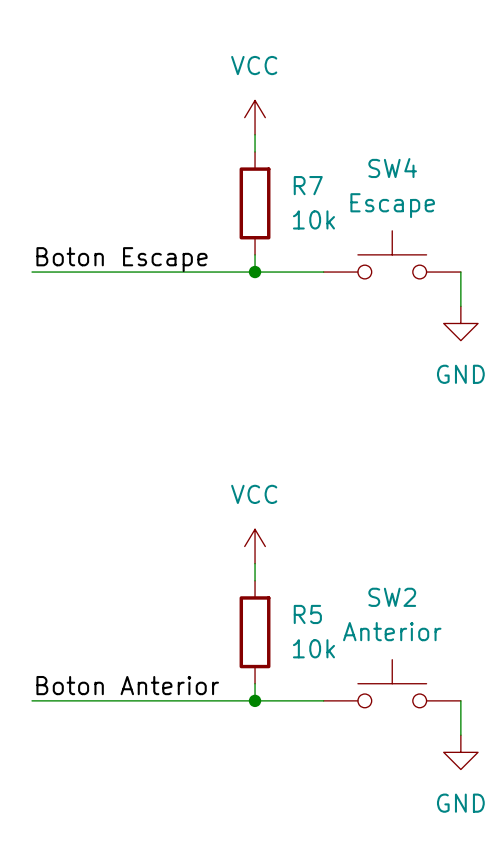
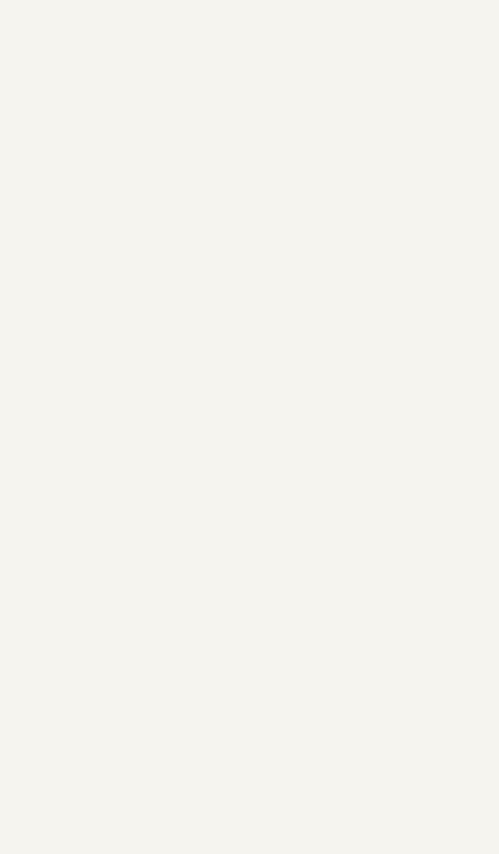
power symbol: VCC (255, 117) -> none
wire: (255, 134) (255, 151) -> none
R7: 10k (255, 203) -> none
wire: (255, 254) (255, 272) -> none
SW4: Escape (392, 254) -> none
label: Boton Escape (122, 259) -> none
wire: (32, 272) (323, 272) -> none
junction: (255, 272) -> none
wire: (460, 272) (460, 306) -> none
power symbol: GND (460, 323) -> none
power symbol: VCC (255, 546) -> none
wire: (255, 563) (255, 580) -> none
R5: 10k (255, 632) -> none
wire: (255, 683) (255, 700) -> none
SW2: Anterior (392, 683) -> none
label: Boton Anterior (127, 685) -> none
wire: (32, 700) (323, 700) -> none
junction: (255, 700) -> none
wire: (460, 700) (460, 735) -> none
power symbol: GND (460, 752) -> none

